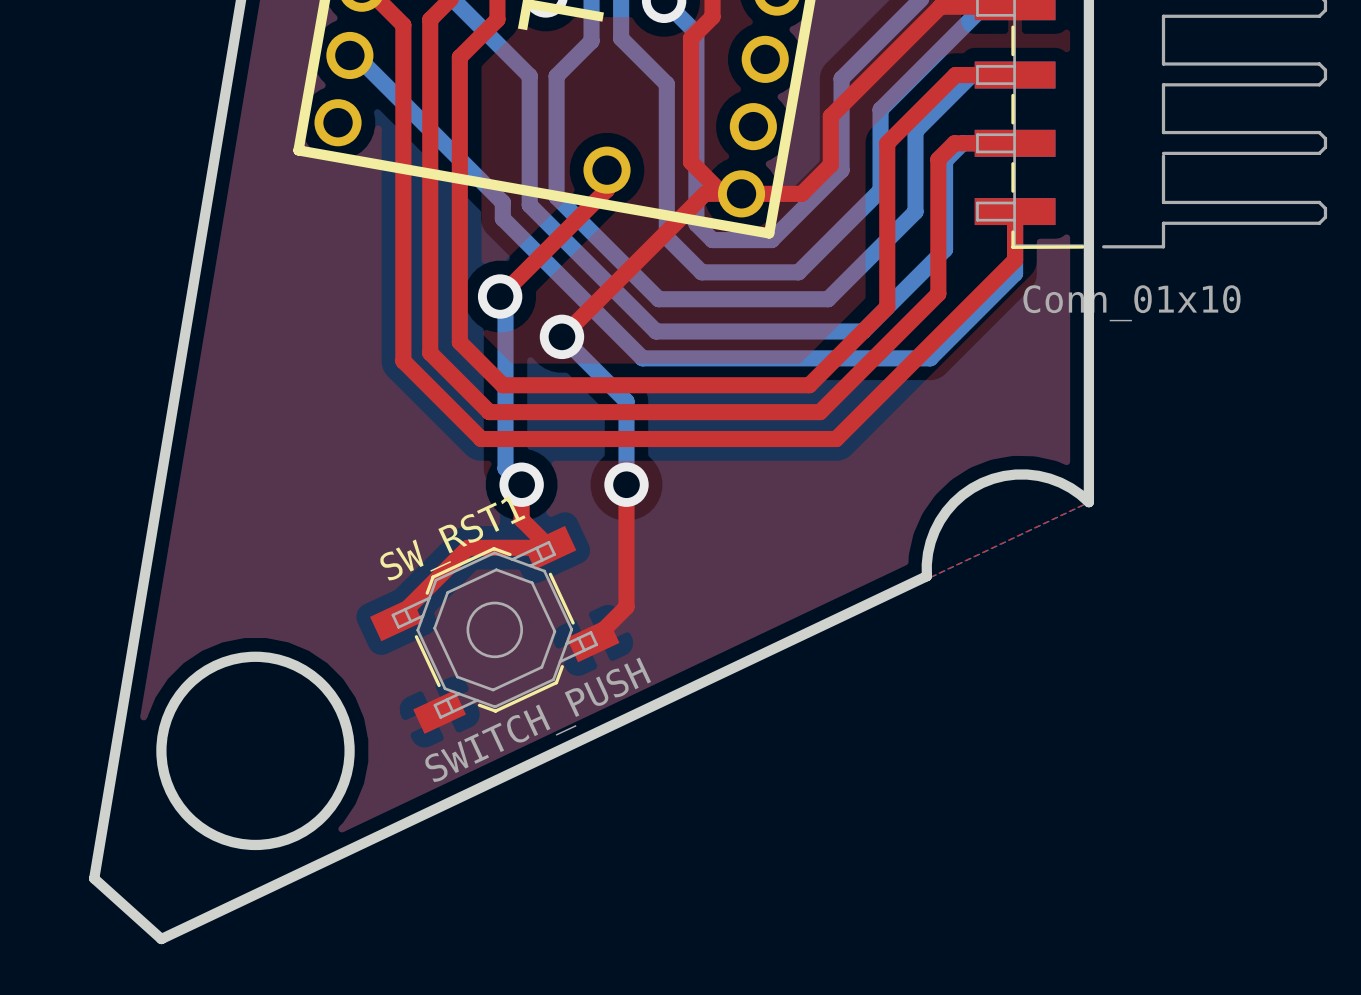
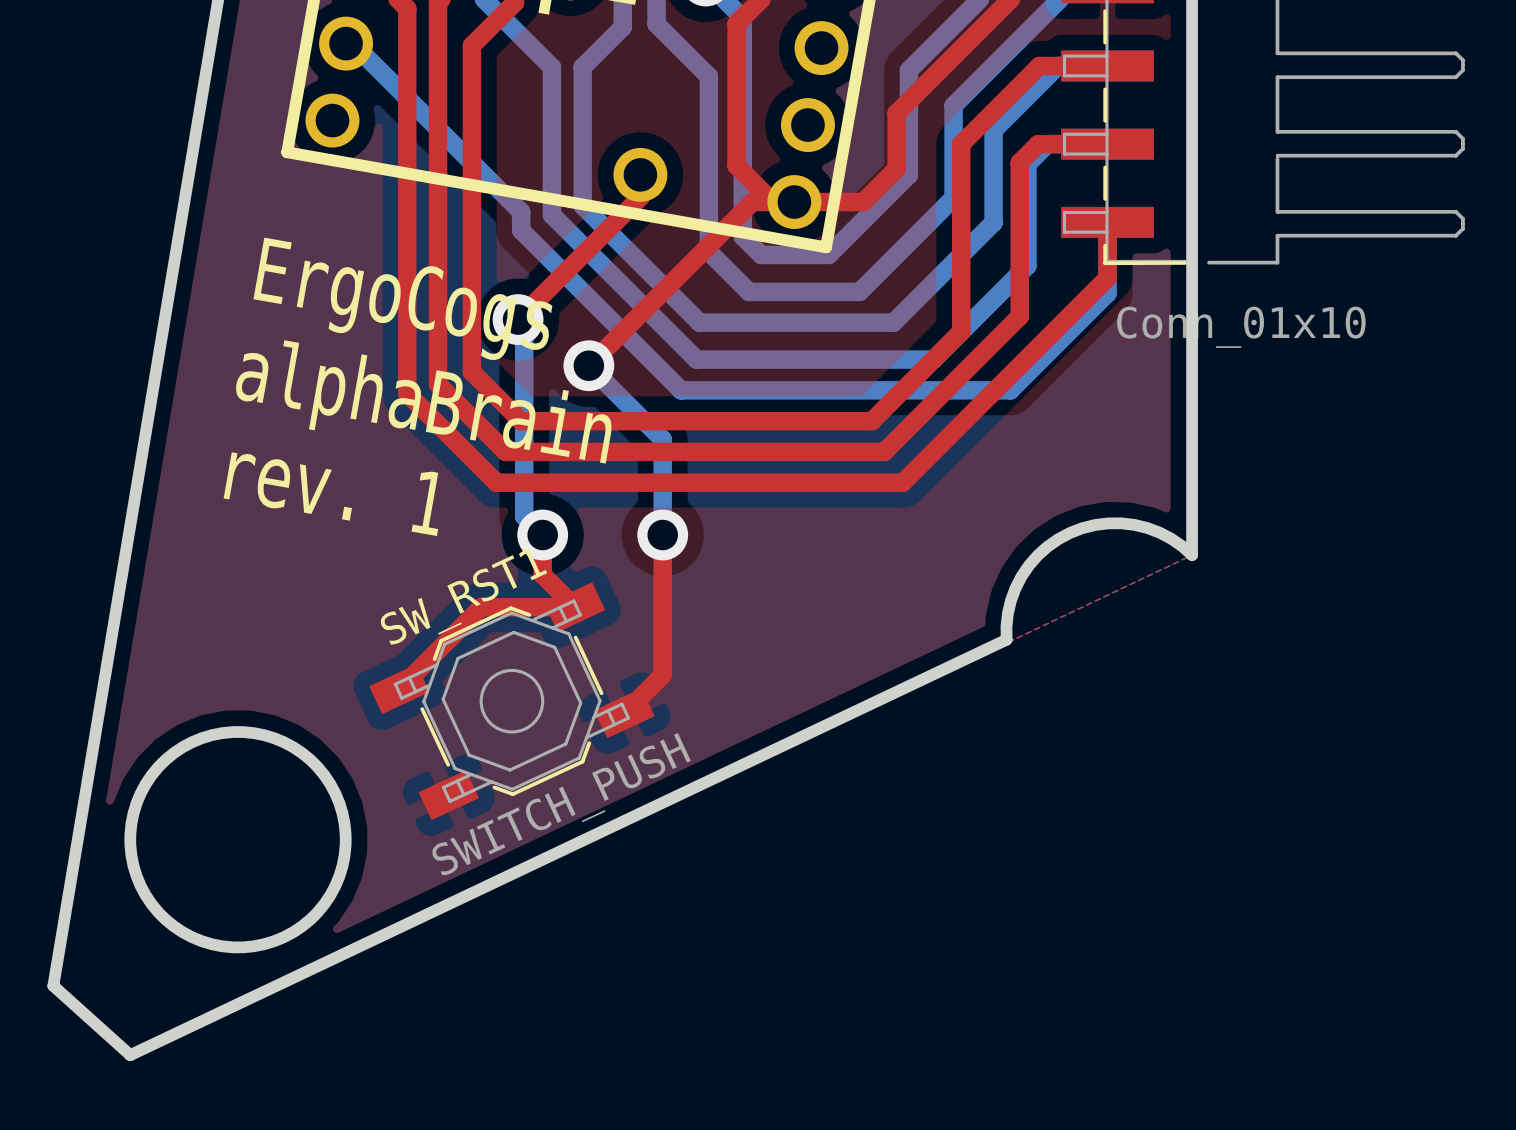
text: none -> ErgoCogs (402, 299)
text: none -> alphaBrain (423, 401)
text: none -> rev. 1 (330, 494)

